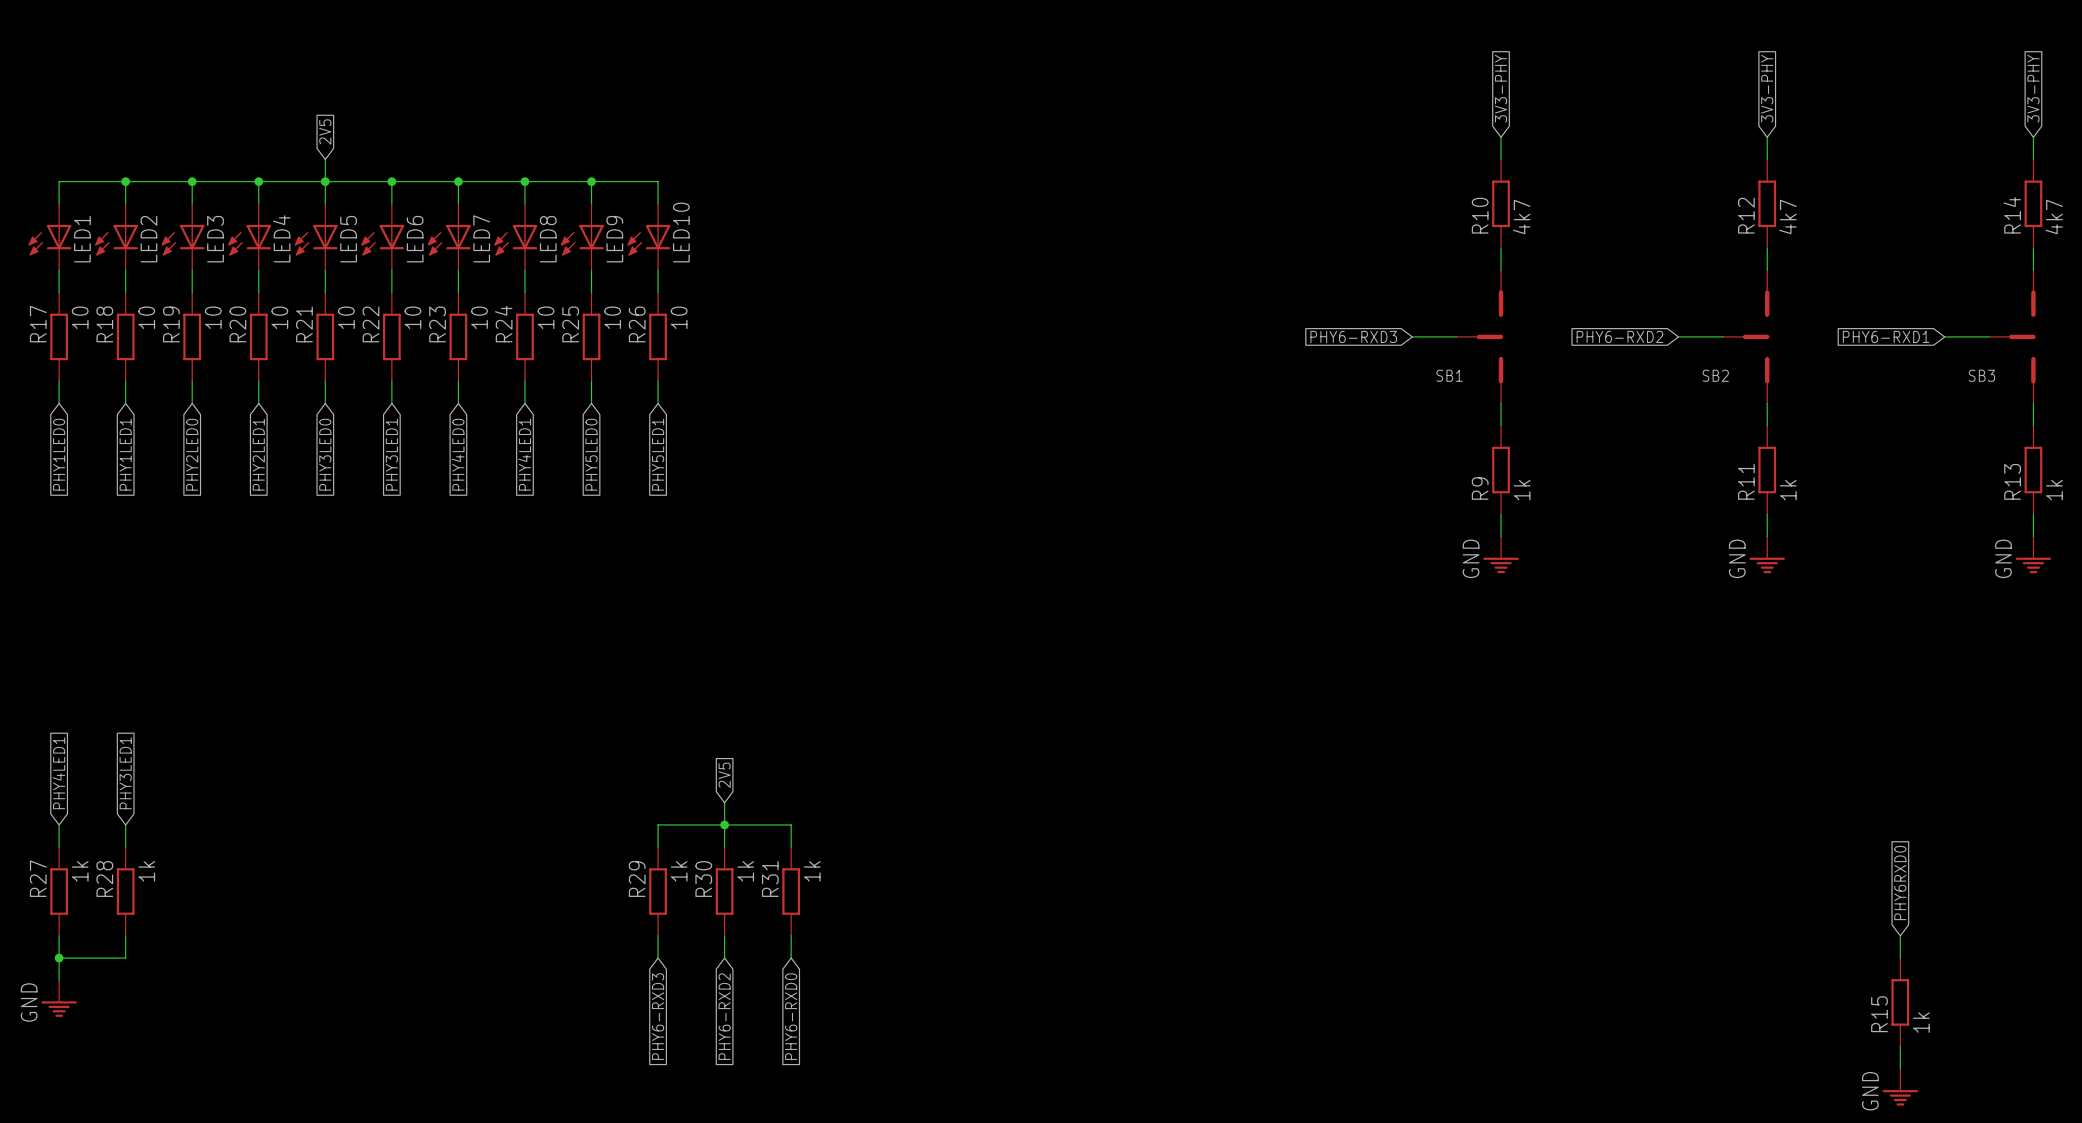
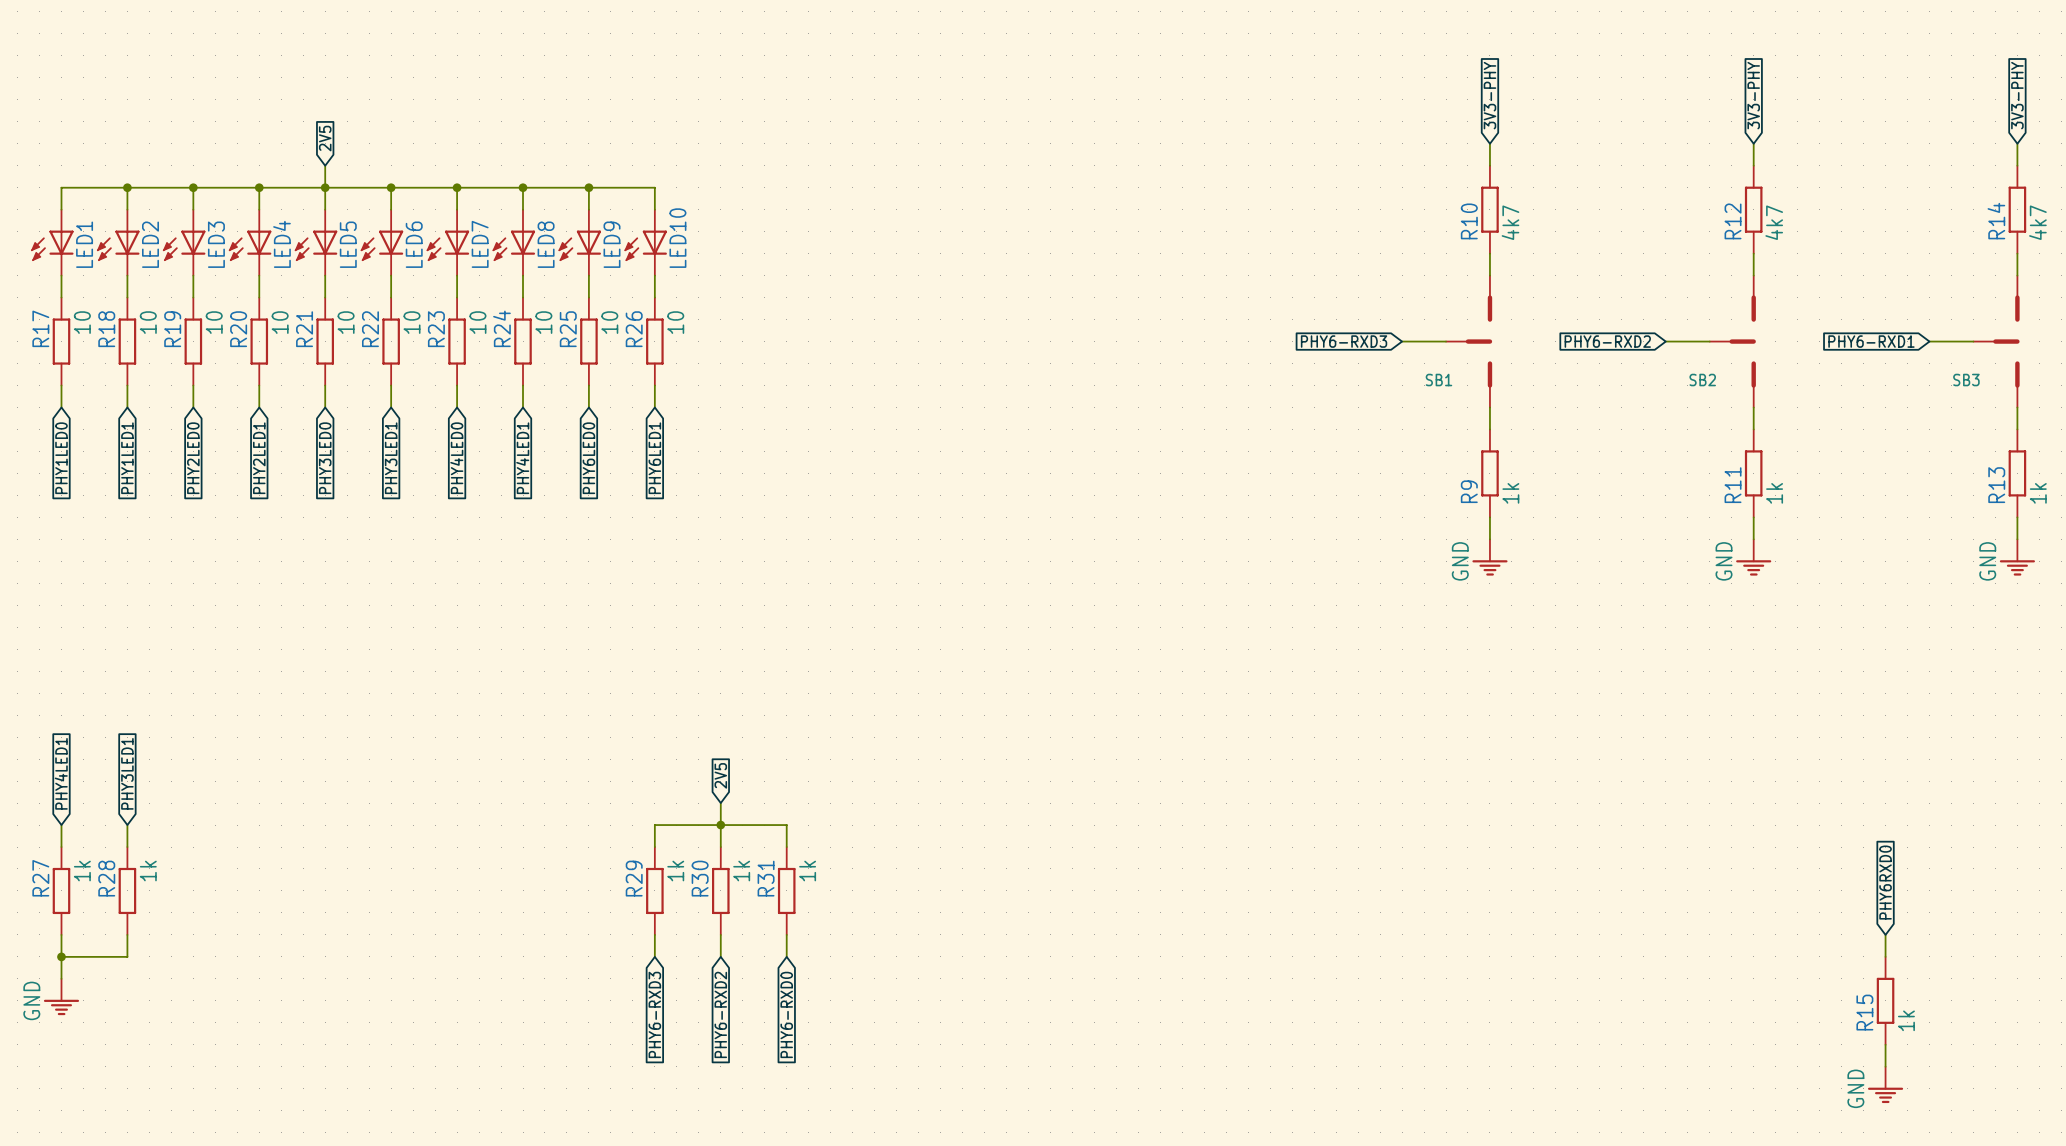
global label: PHY5LED0 (591, 454) -> PHY6LED0 (588, 458)
global label: PHY5LED1 (658, 454) -> PHY6LED1 (654, 458)

